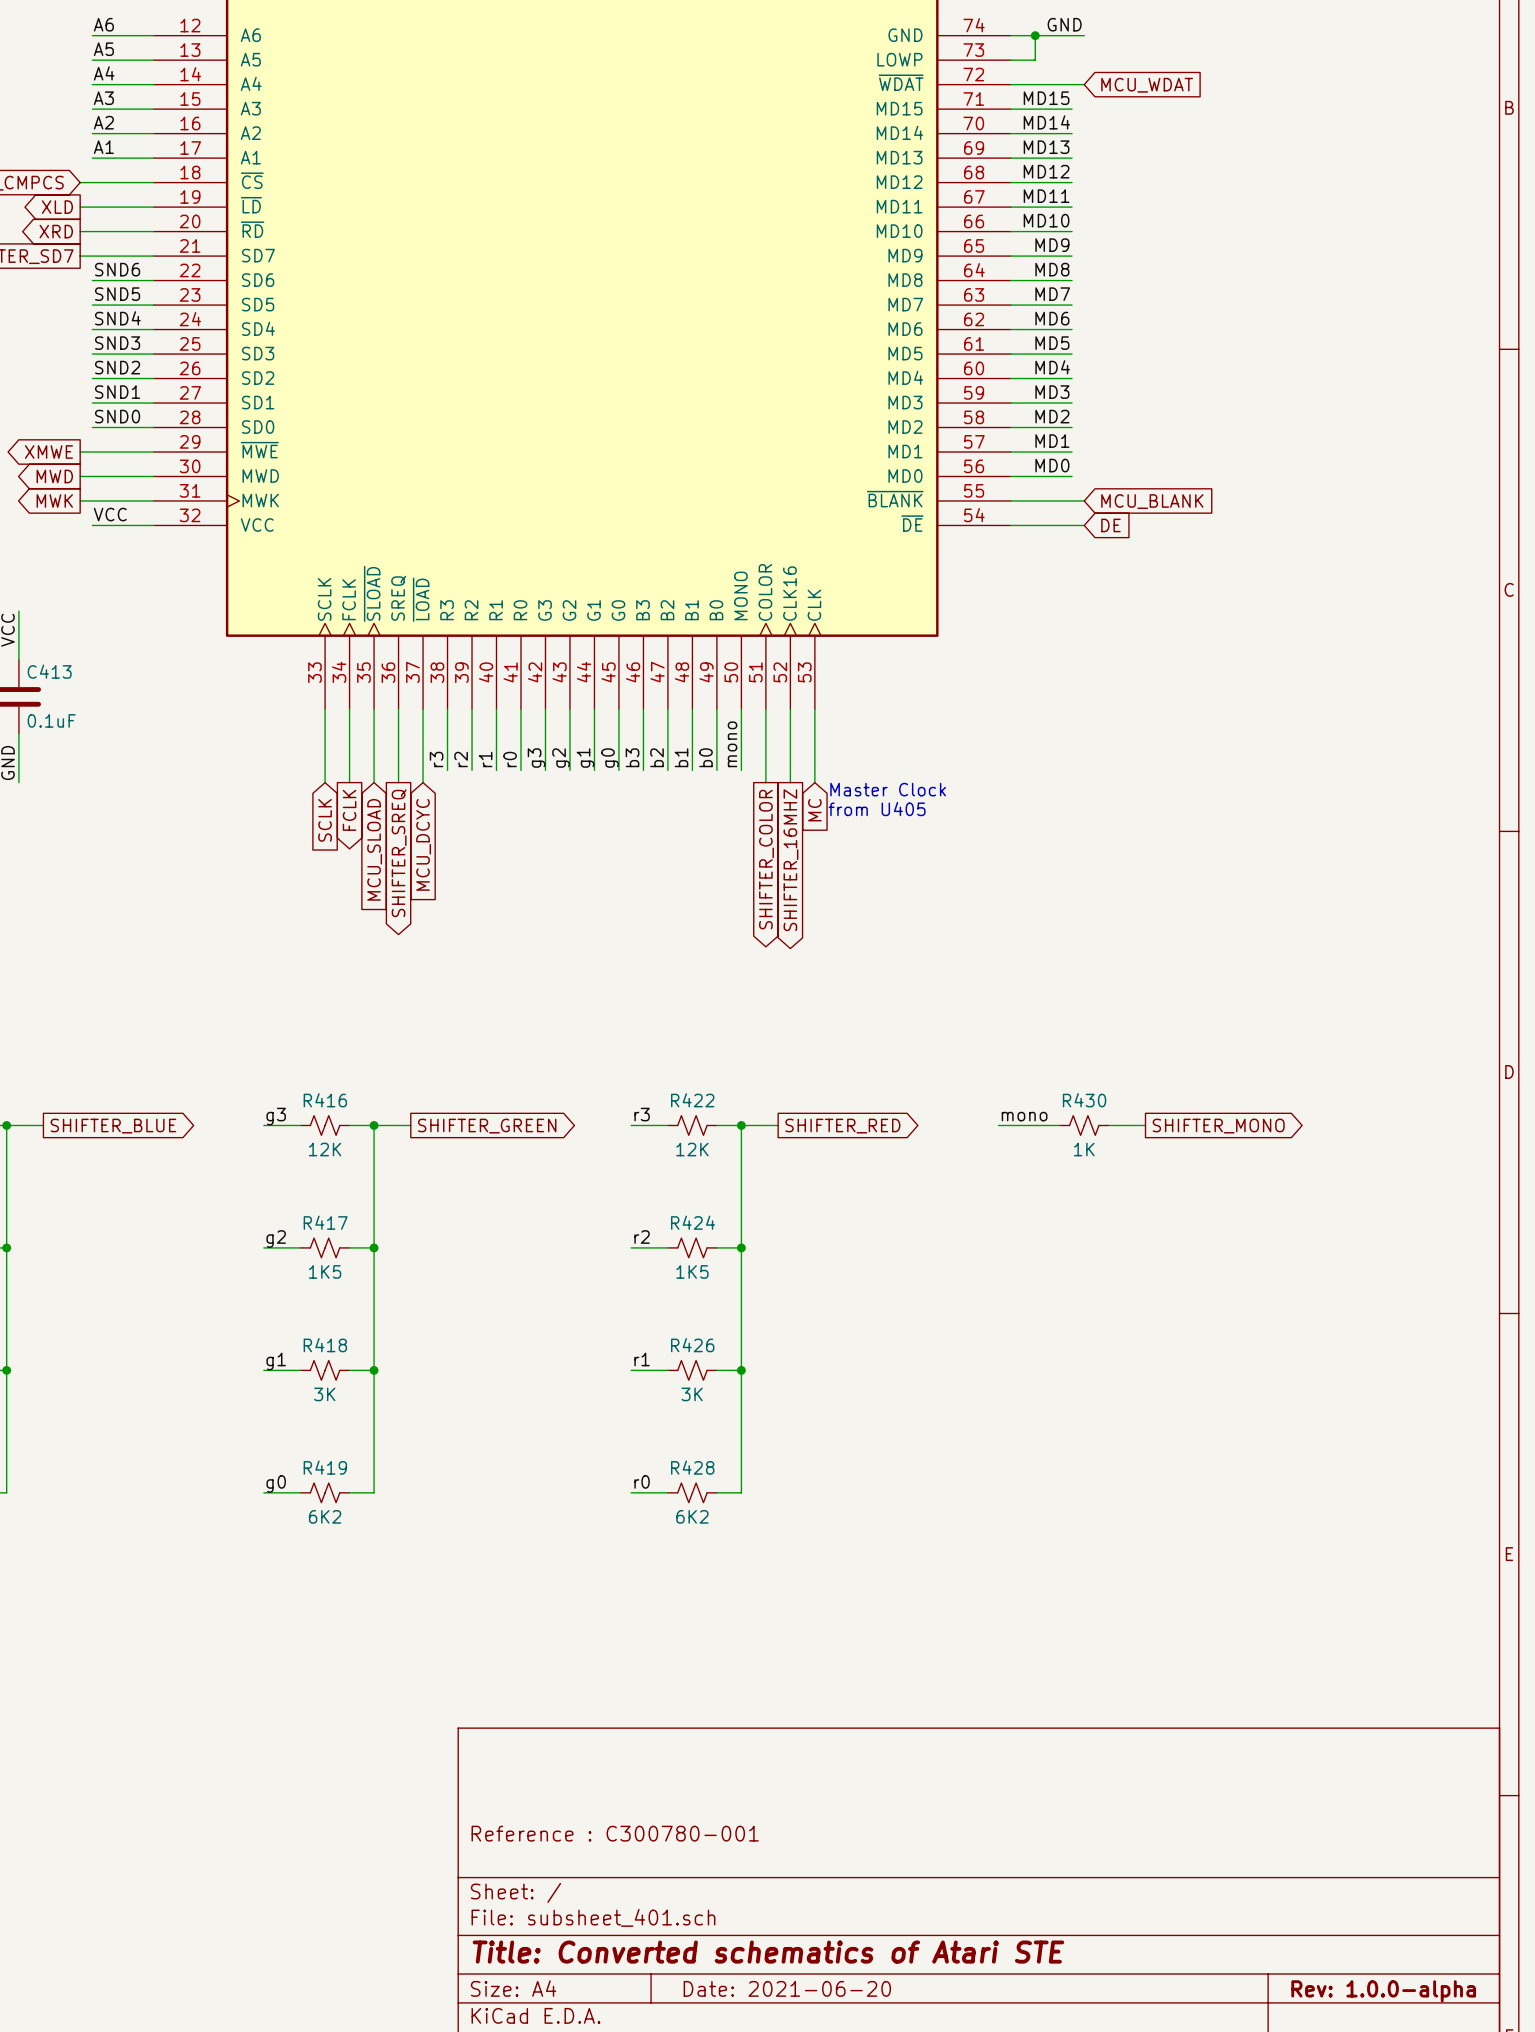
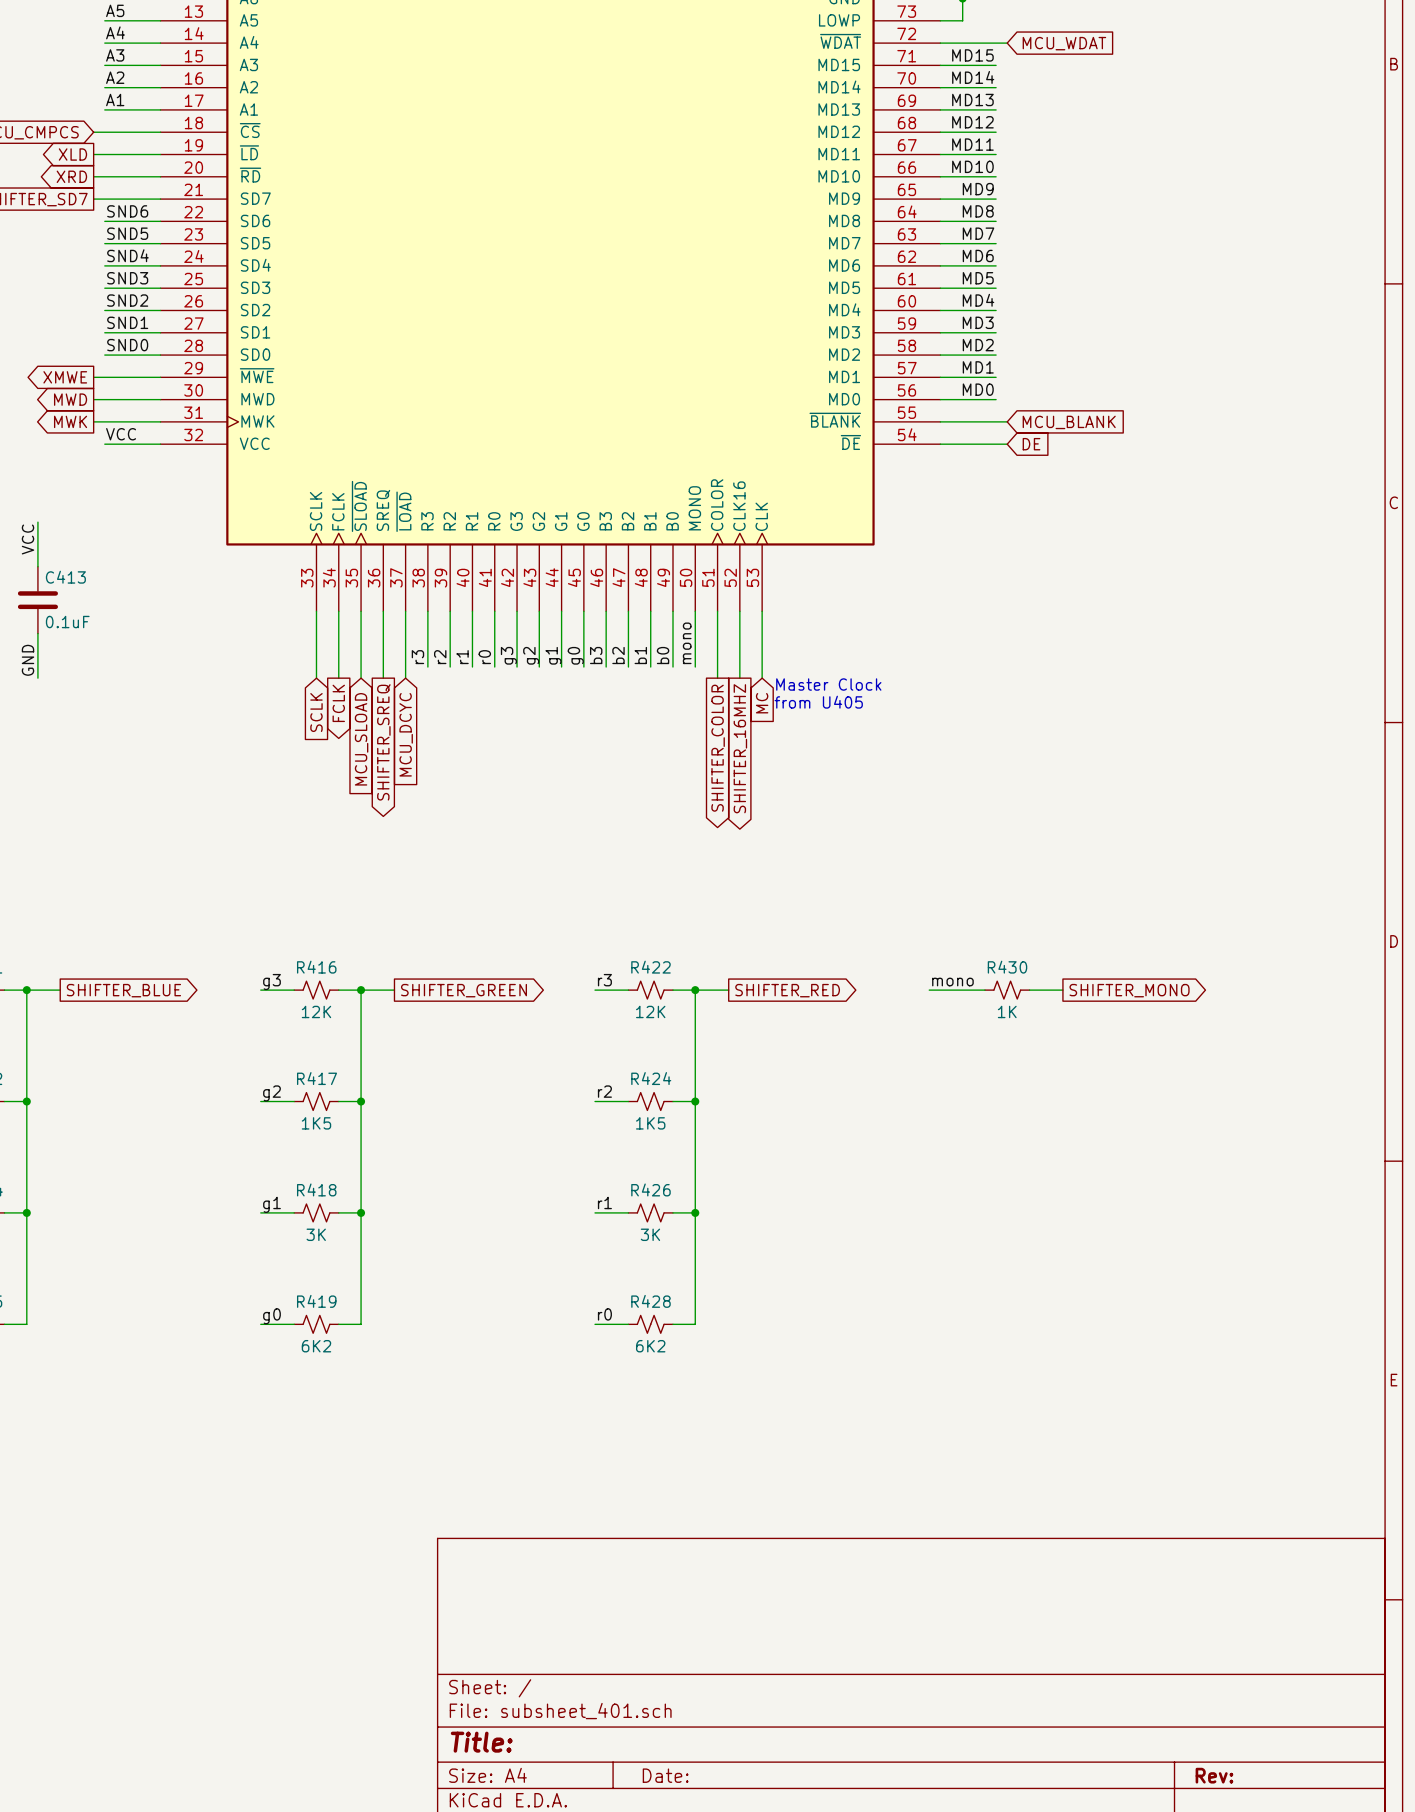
title block: Reference : C300780-001 (615, 1833) -> none
title block: Title: Converted schematics of Atari STE (768, 1952) -> Title: (481, 1742)
title block: Date: 2021-06-20 (787, 1988) -> Date: (665, 1775)
title block: Rev: 1.0.0-alpha (1383, 1991) -> Rev: (1214, 1775)

